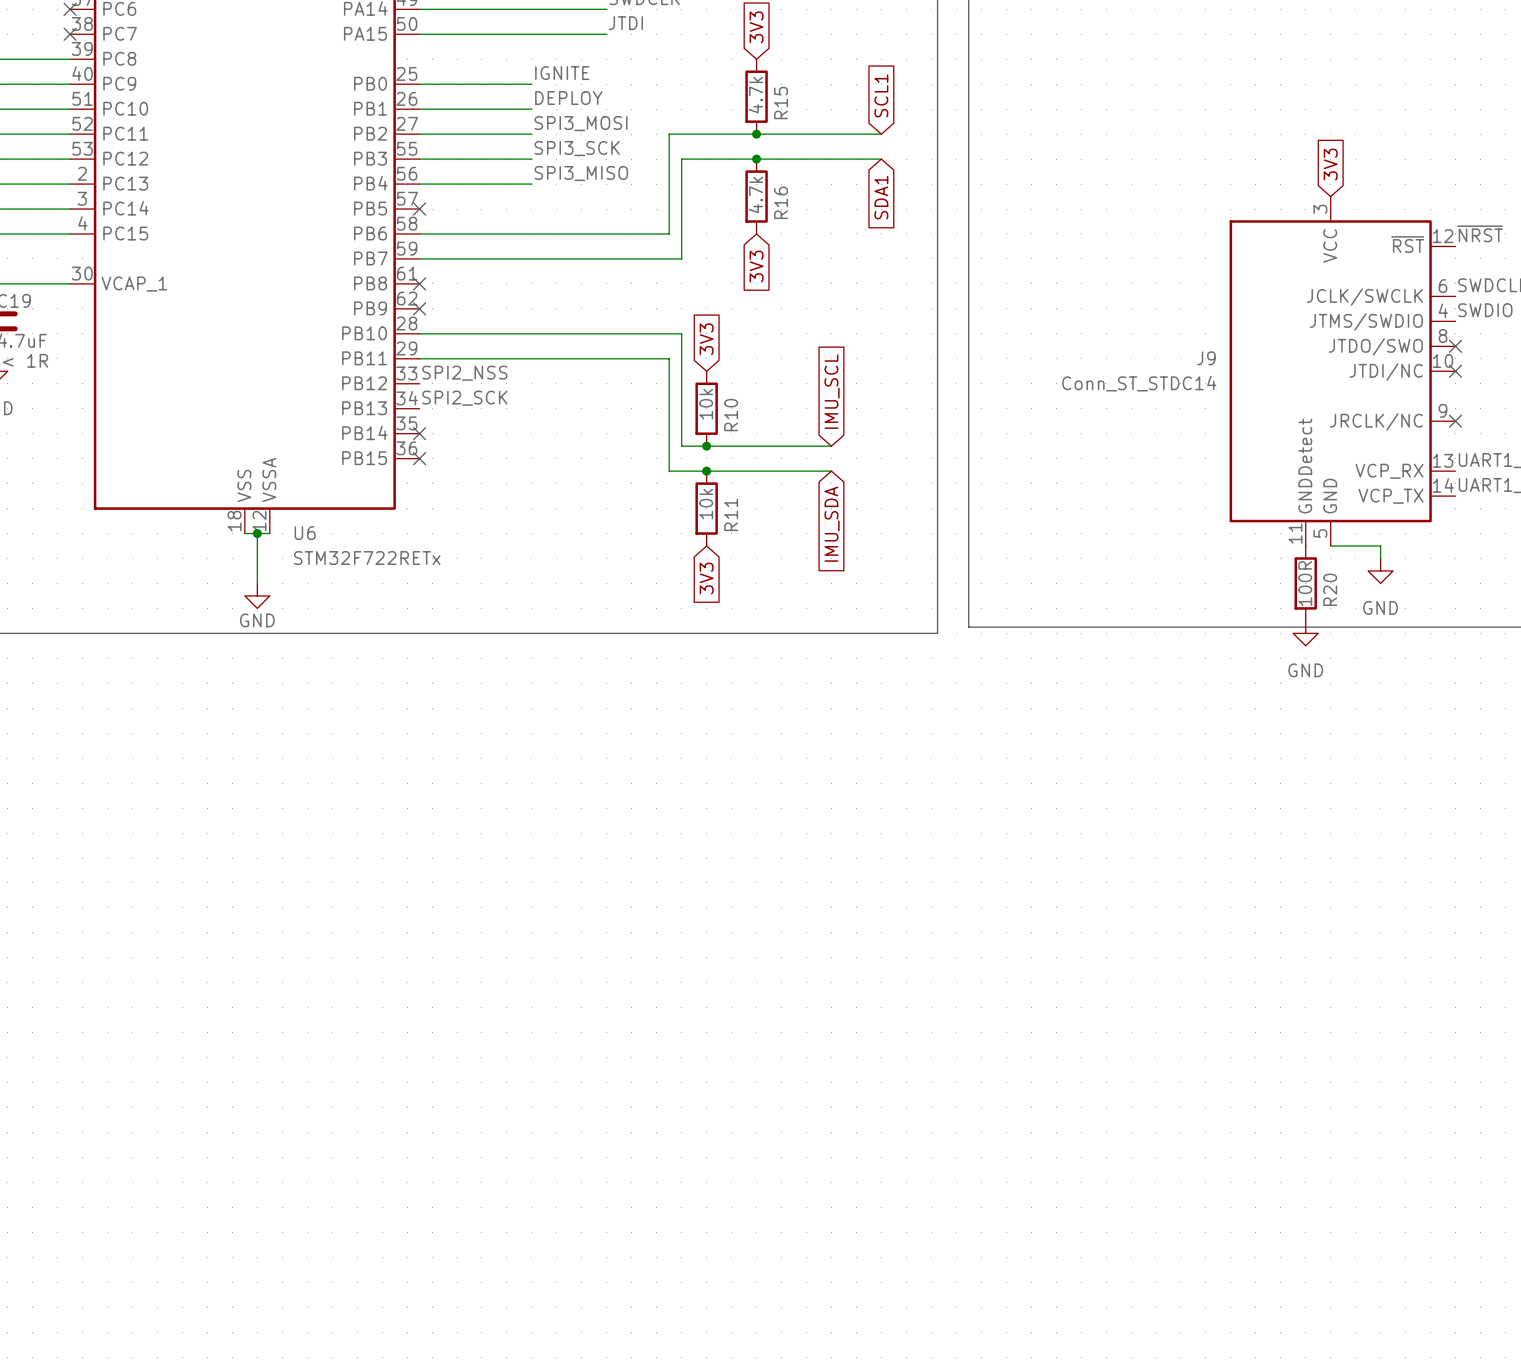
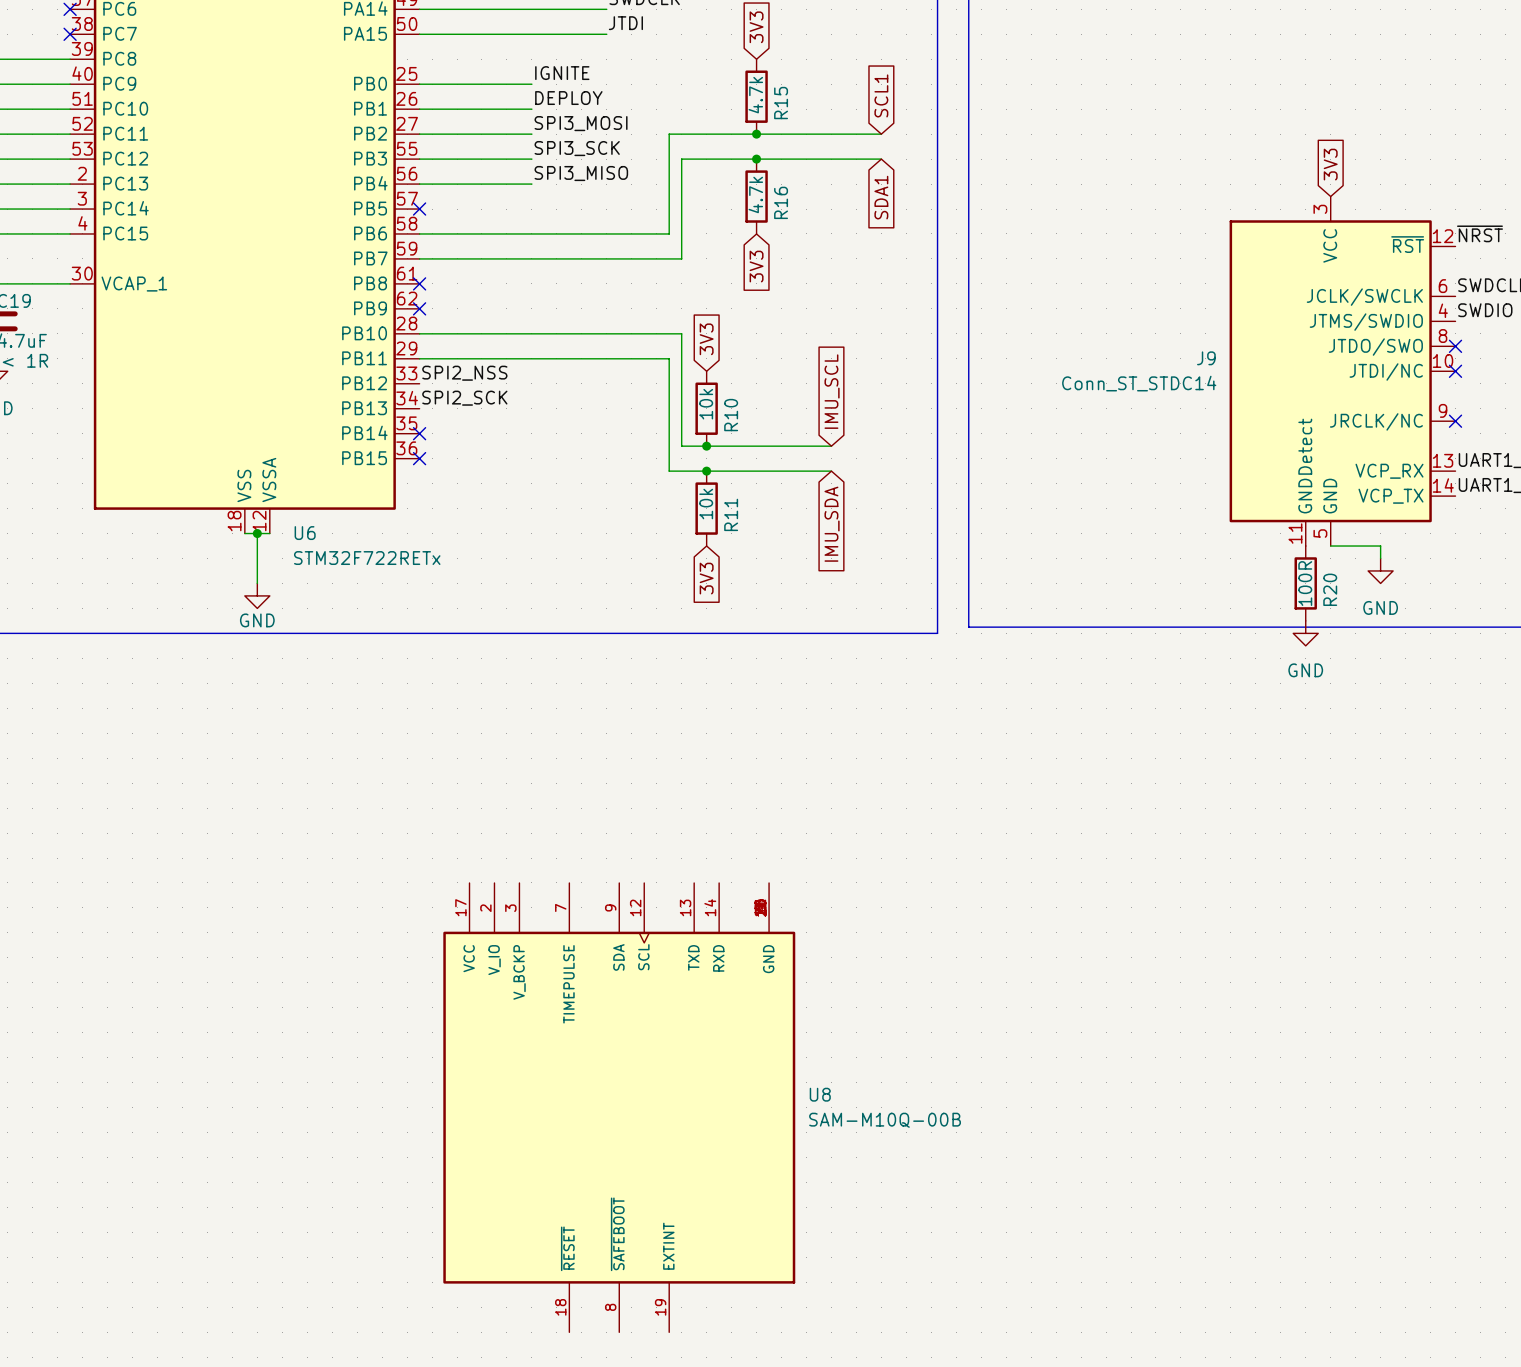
U8: none -> SAM-M10Q-00B (619, 1107)

